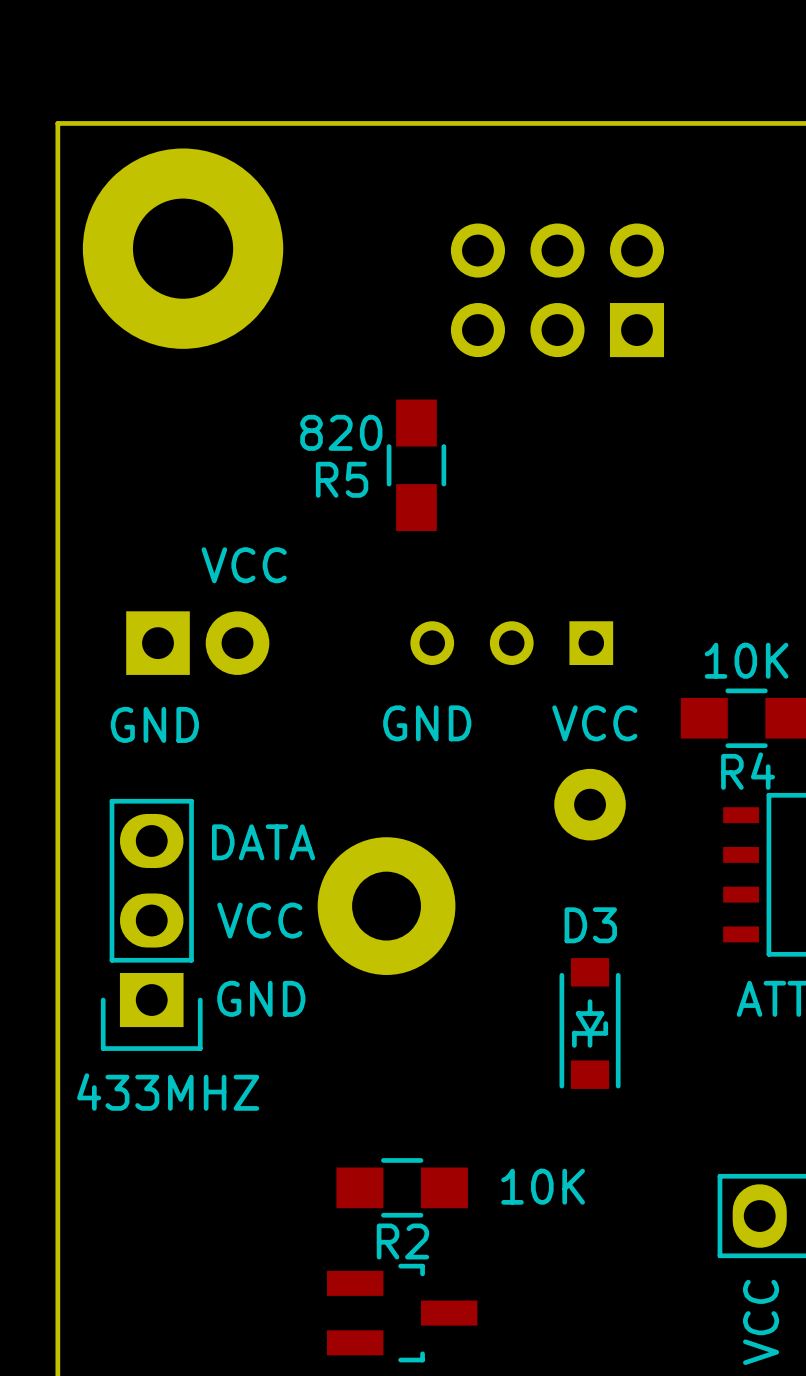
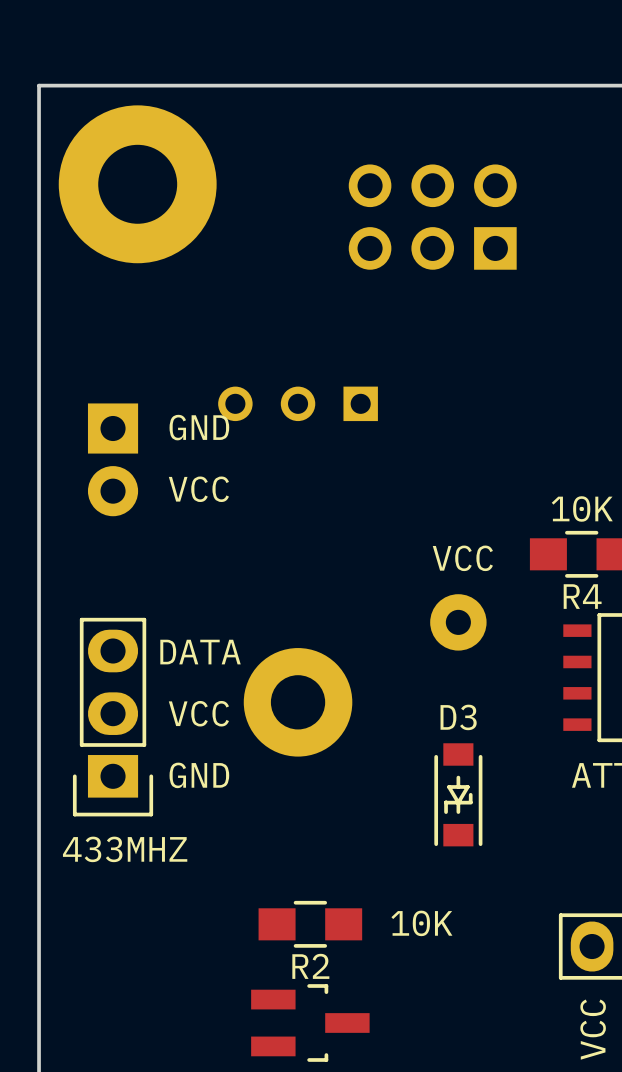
R5: 820 (416, 465) -> none
text: VCC (244, 565) -> GND (199, 427)
text: none -> VCC (198, 489)
part rotation: 0° (197, 643) -> 90° clockwise (113, 459)
part position: (511, 643) -> (298, 403)
text: GND (427, 723) -> none
text: GND (154, 724) -> none

